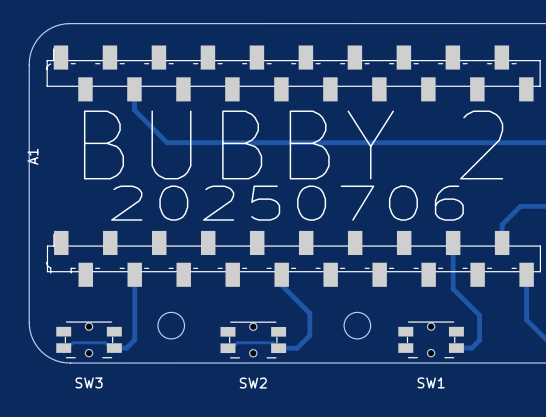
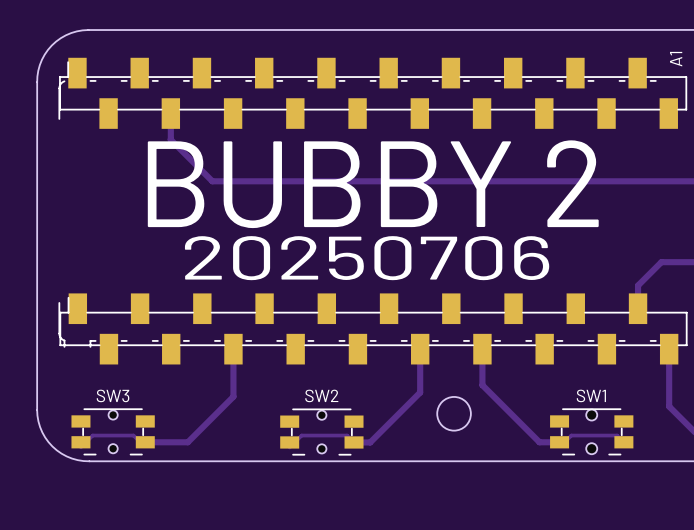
A1 footprint: [46, 45, 541, 287] -> [58, 57, 688, 365]
A1 name position: A1 (32, 156) -> A1 (676, 59)
track: (453, 242) (453, 288) (479, 315) (479, 340) (471, 348) (456, 348) -> none
track: (134, 274) (134, 339) (126, 348) -> (233, 349) (233, 396) (187, 442) (160, 442)
track: (281, 274) (281, 285) (309, 313) (309, 335) (297, 348) (291, 348) -> (420, 349) (420, 392) (370, 442)
track: none -> (482, 349) (482, 385) (539, 442) (554, 442)
round board edge: [157, 312, 185, 340] -> none
SW1 footprint: [398, 321, 464, 359] -> [550, 408, 634, 456]
track: none -> (559, 442) (564, 442) (571, 435) (617, 435) (623, 442)
SW3 name position: SW3 (89, 382) -> SW3 (113, 395)
SW1 name position: SW1 (431, 382) -> SW1 (591, 395)
SW2 name position: SW2 (253, 383) -> SW2 (321, 395)

